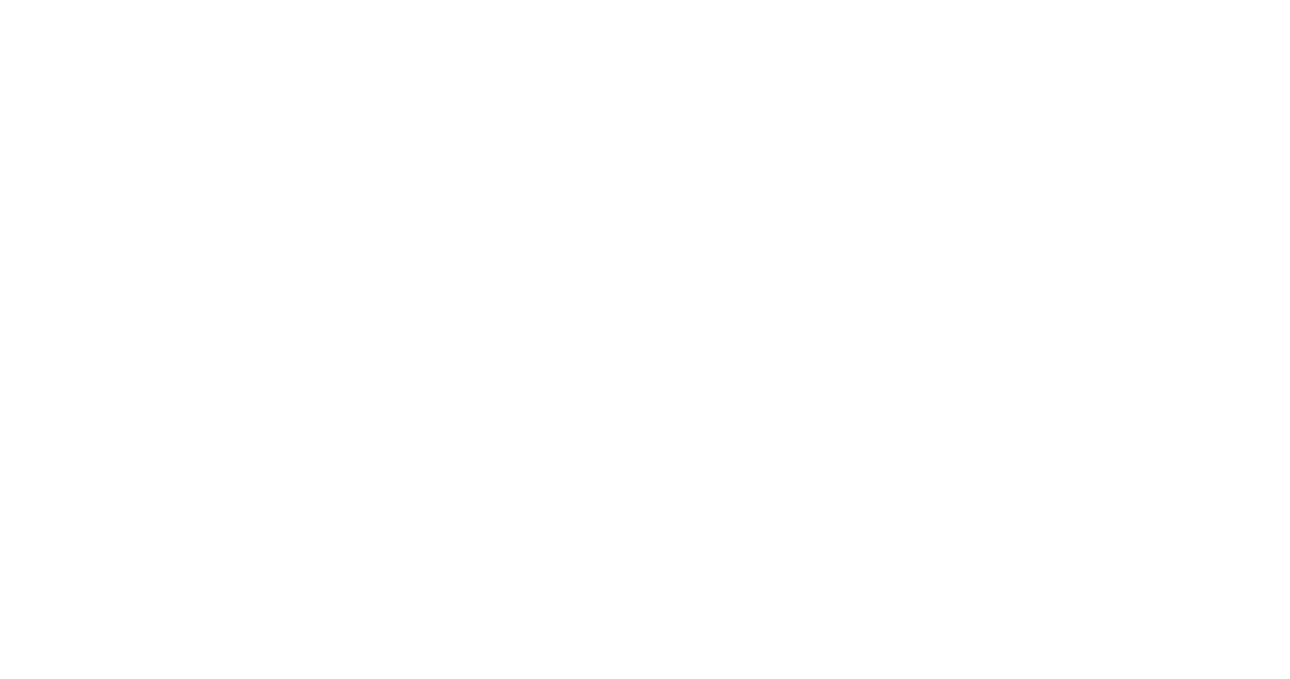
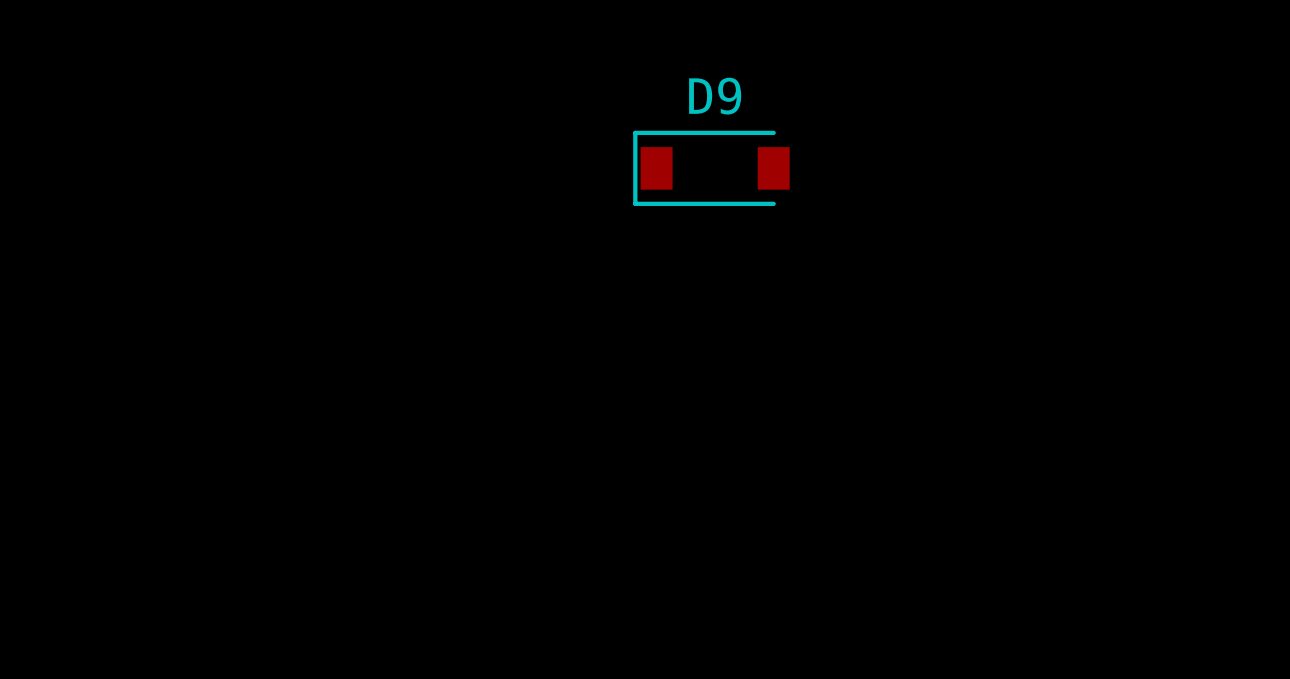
D9: none -> (711, 168)

